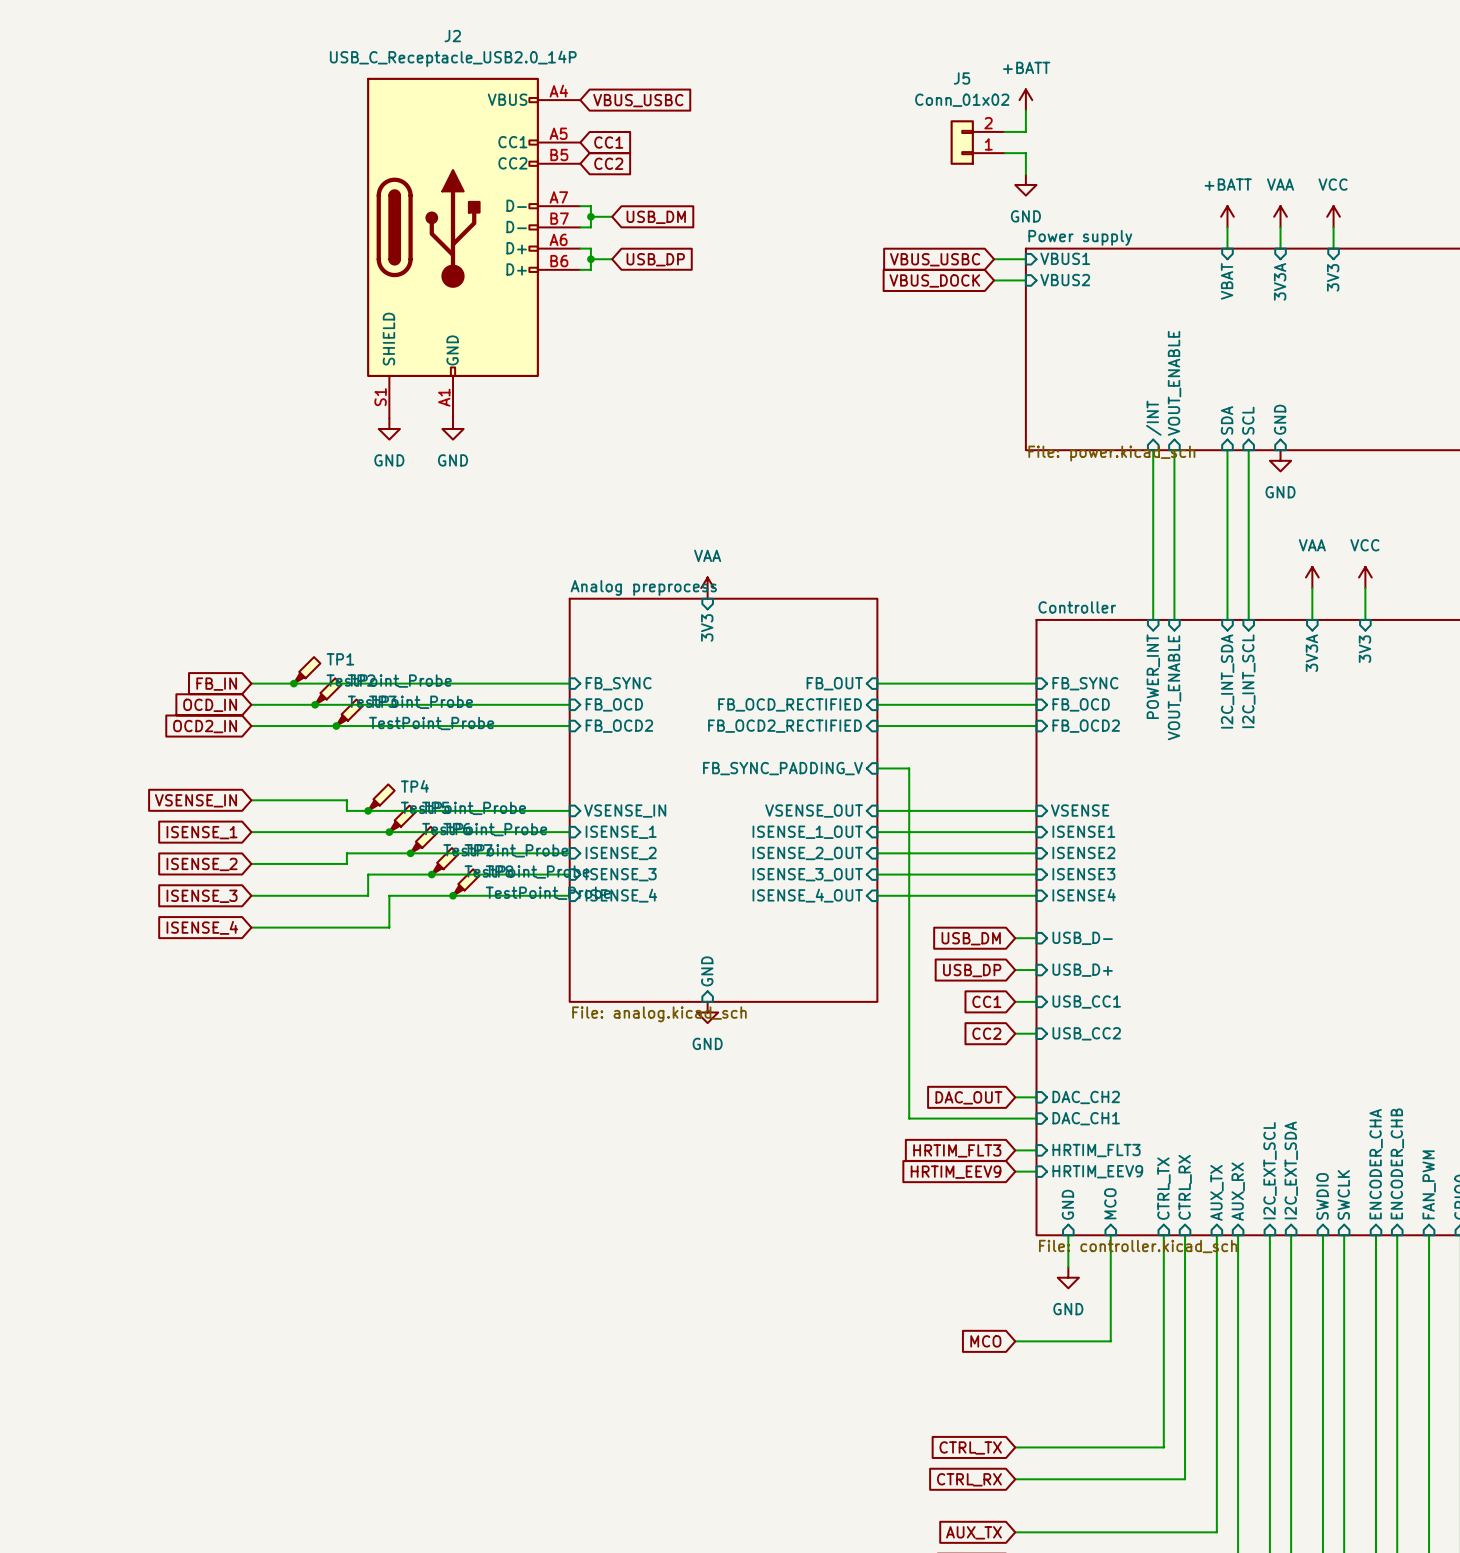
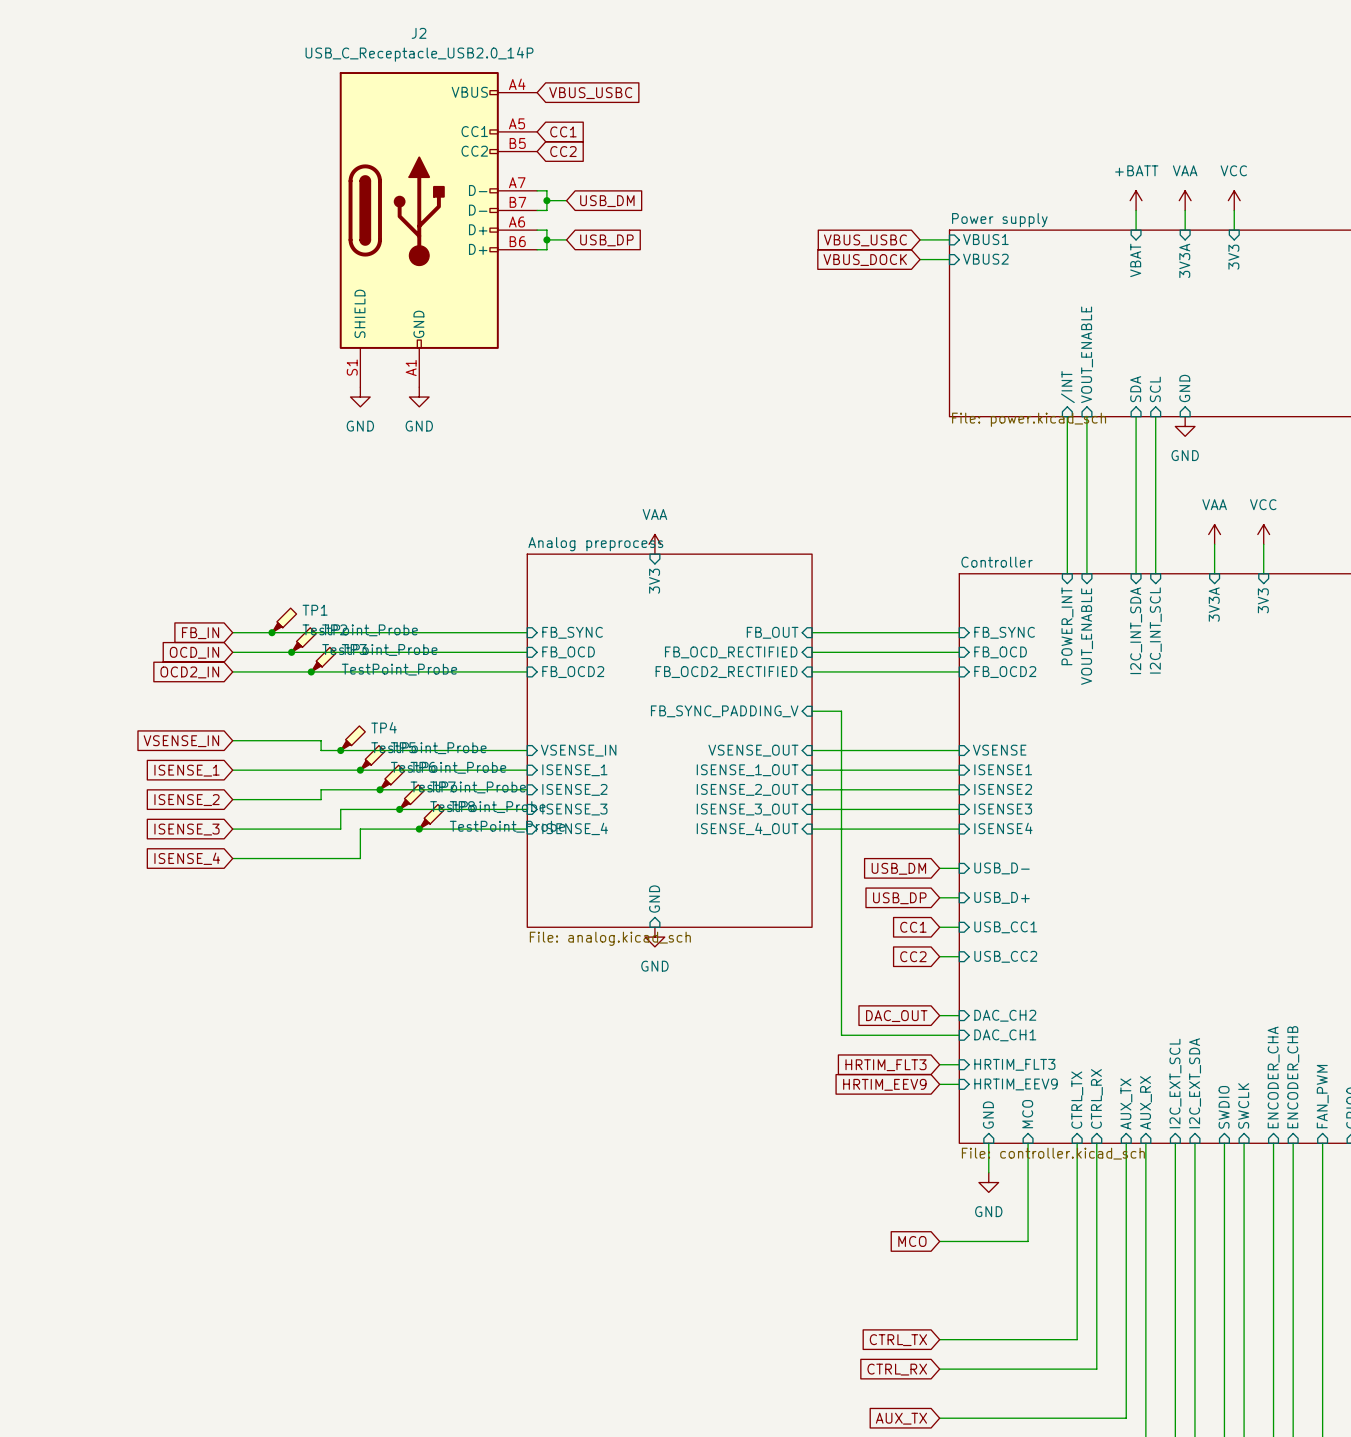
power symbol: +BATT (1025, 100) -> none
wire: (1025, 110) (1025, 131) (1004, 131) -> none
J5: Conn_01x02 (977, 142) -> none
wire: (1004, 153) (1025, 153) (1025, 174) -> none
power symbol: GND (1025, 184) -> none

